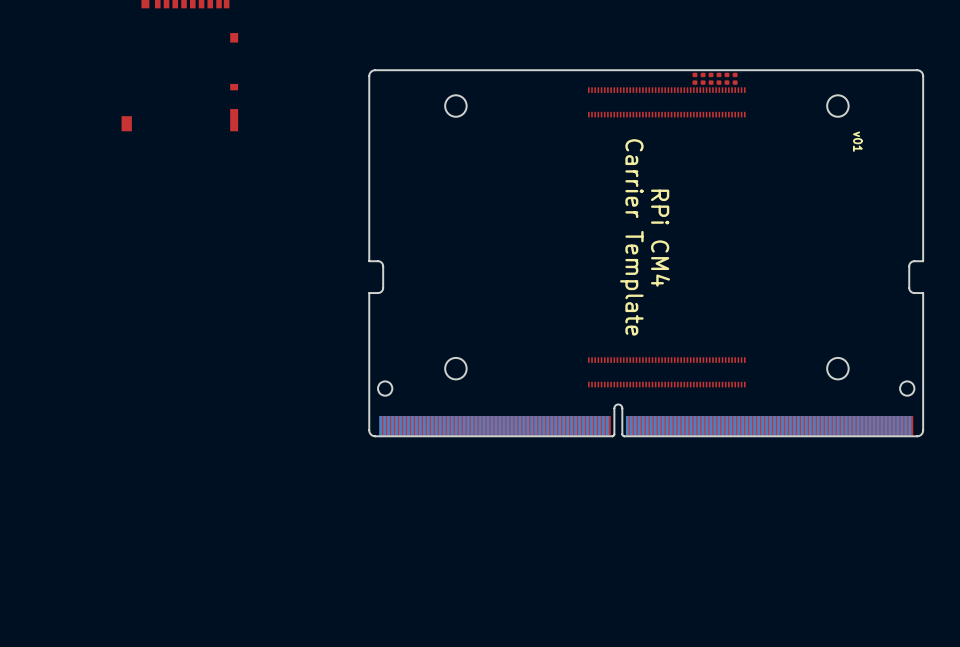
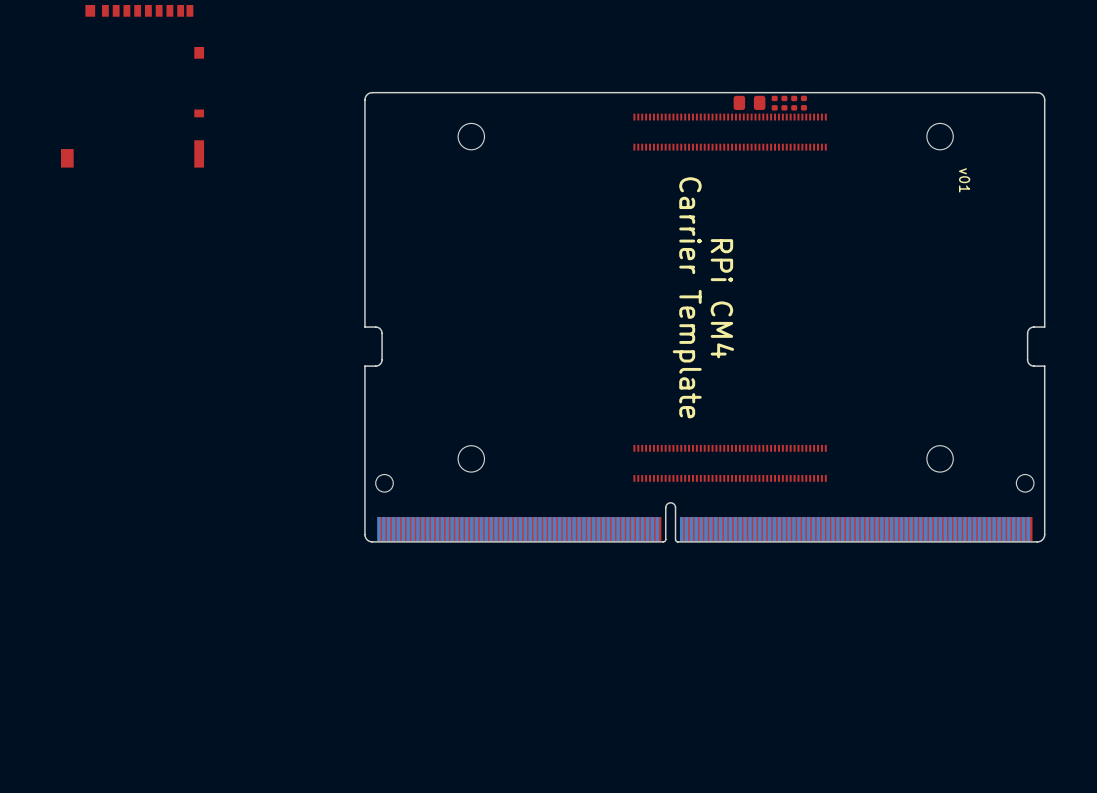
part: none -> (749, 102)
part: (694, 78) -> none
part: (735, 78) -> none

